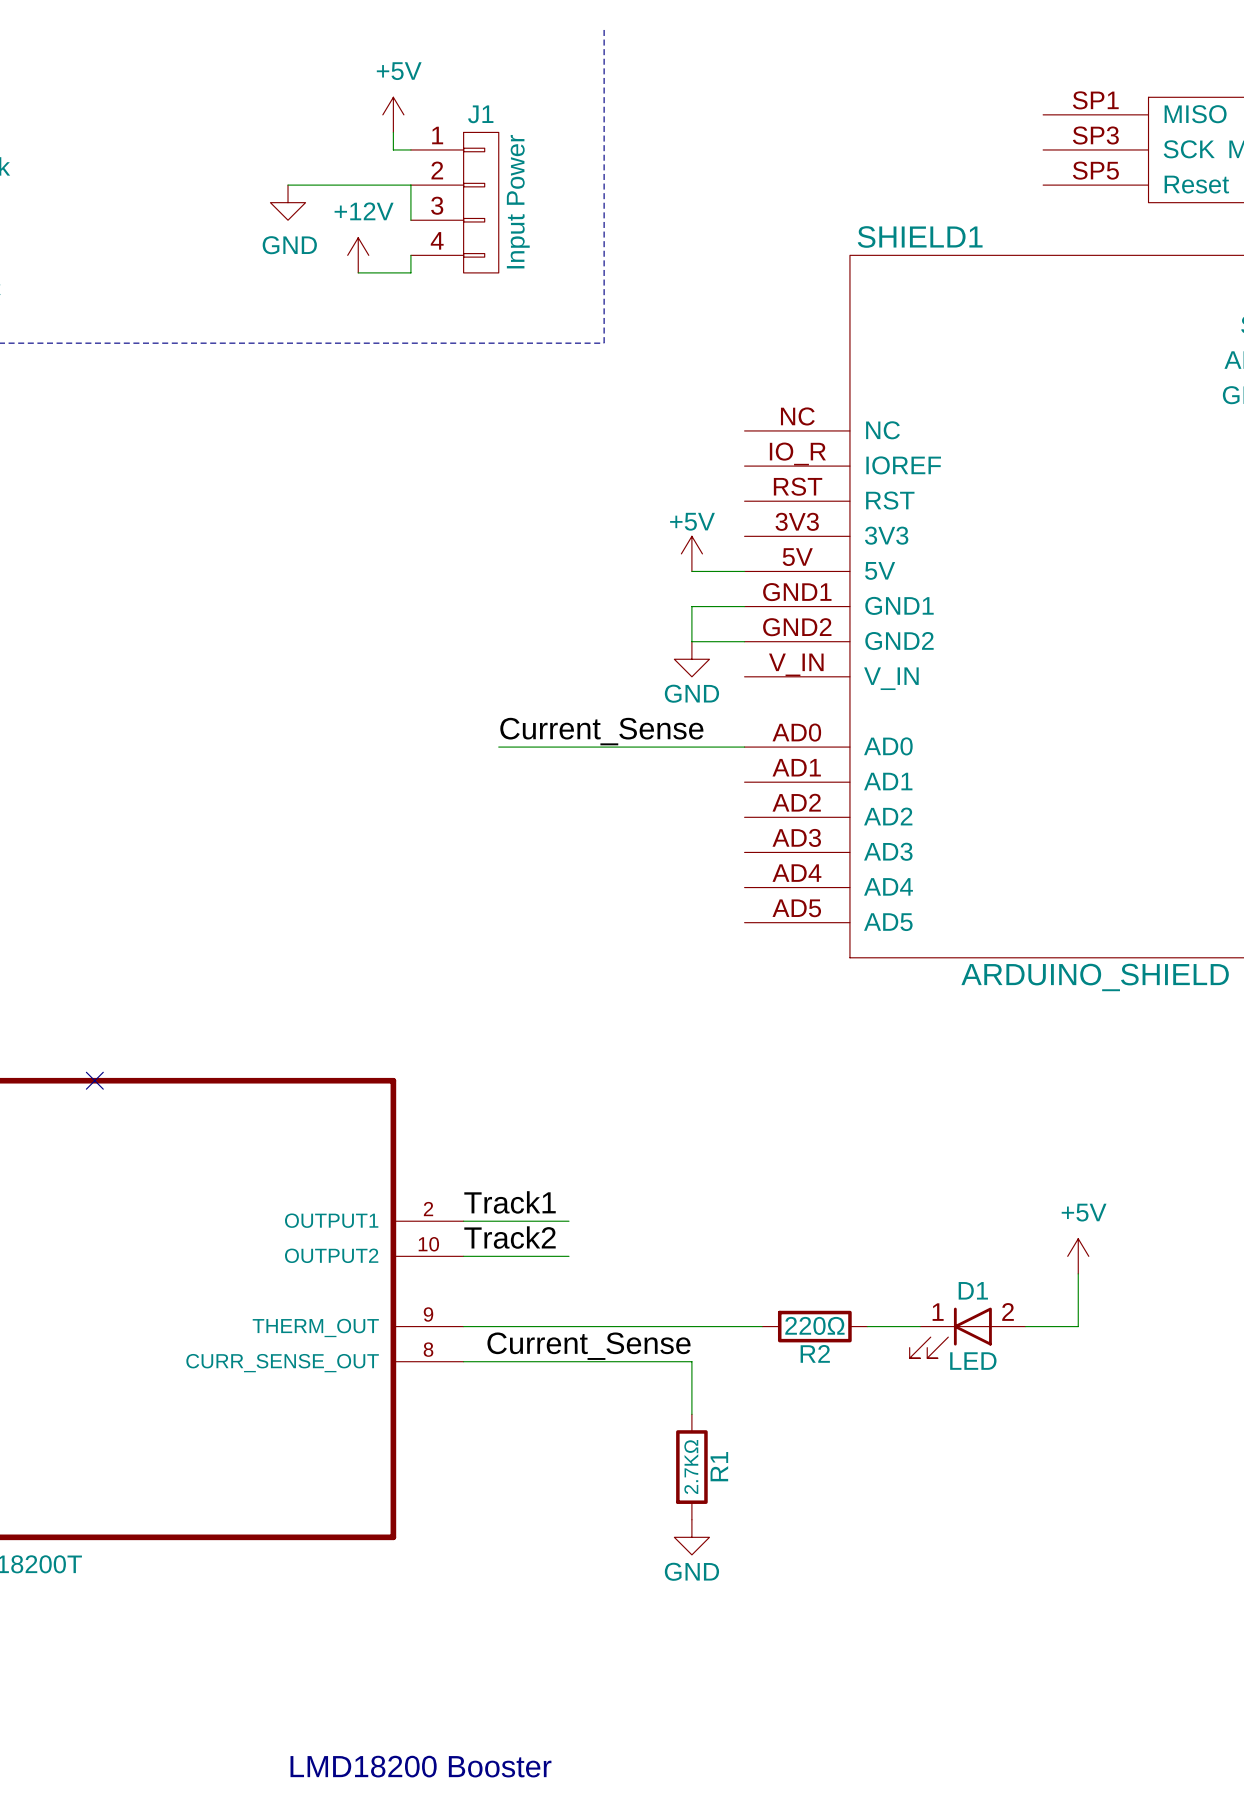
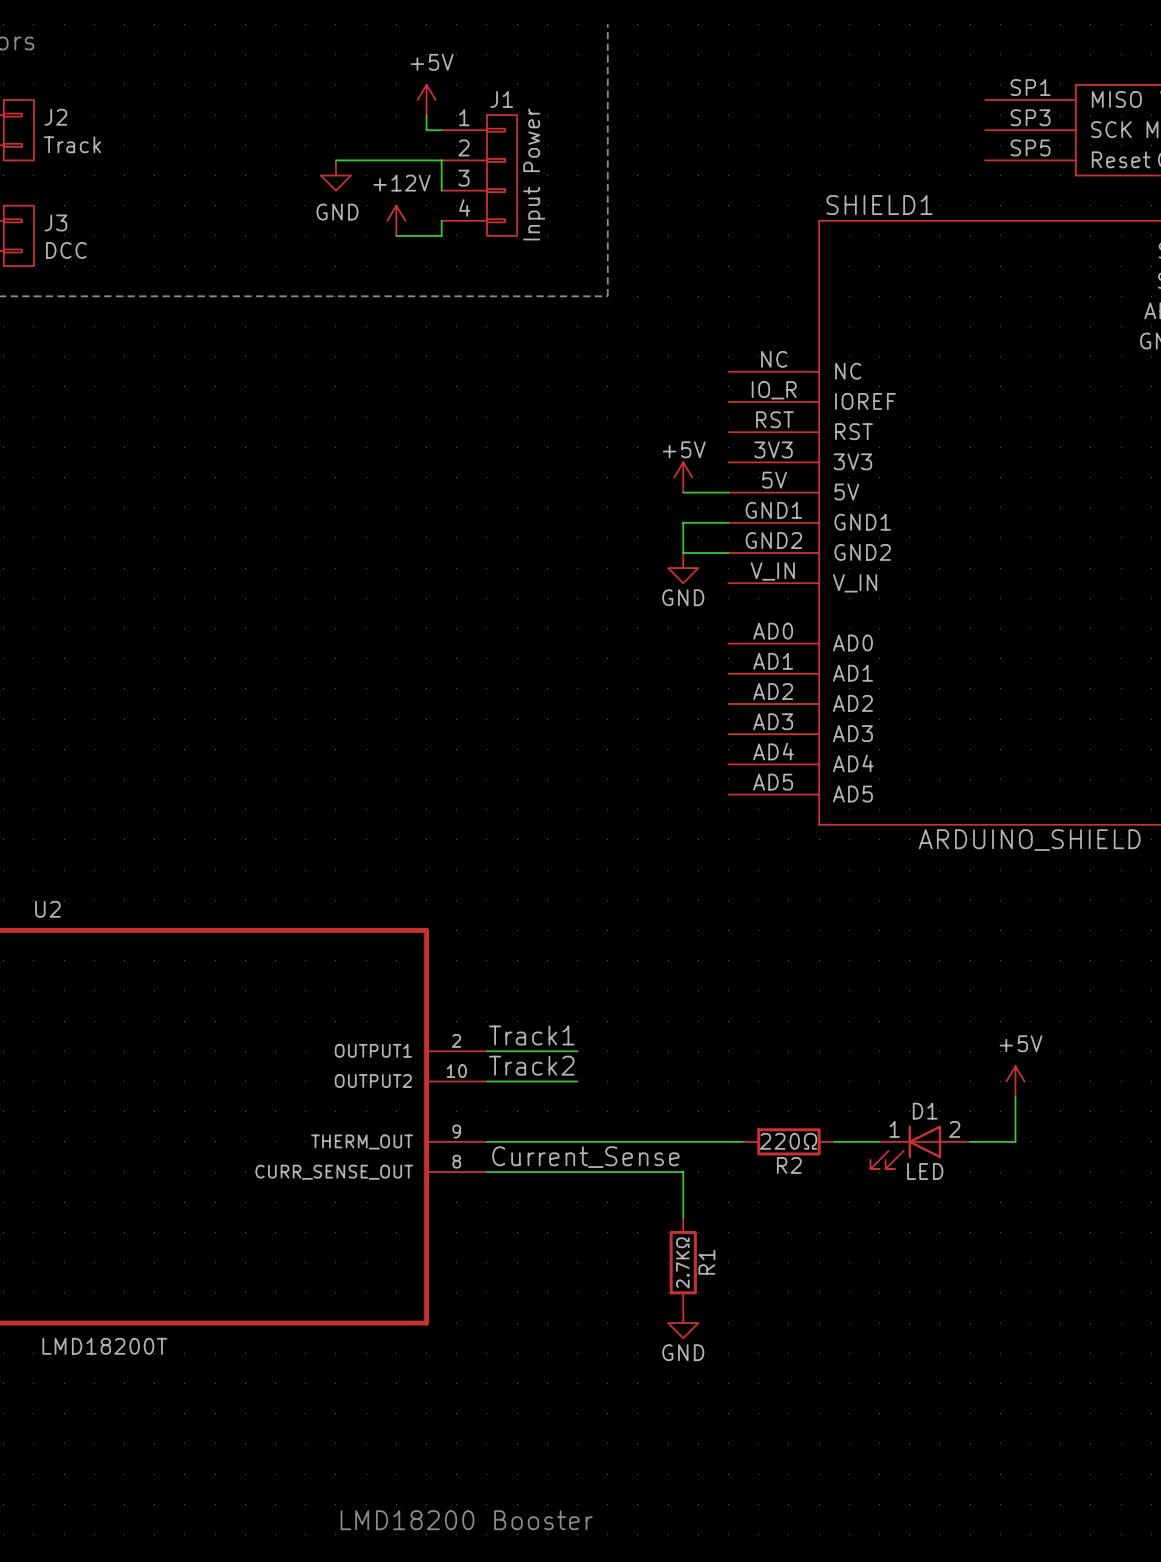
label: Current_Sense (601, 731) -> none
wire: (498, 747) (744, 747) -> none
no-connect mark: (94, 1080) -> none

